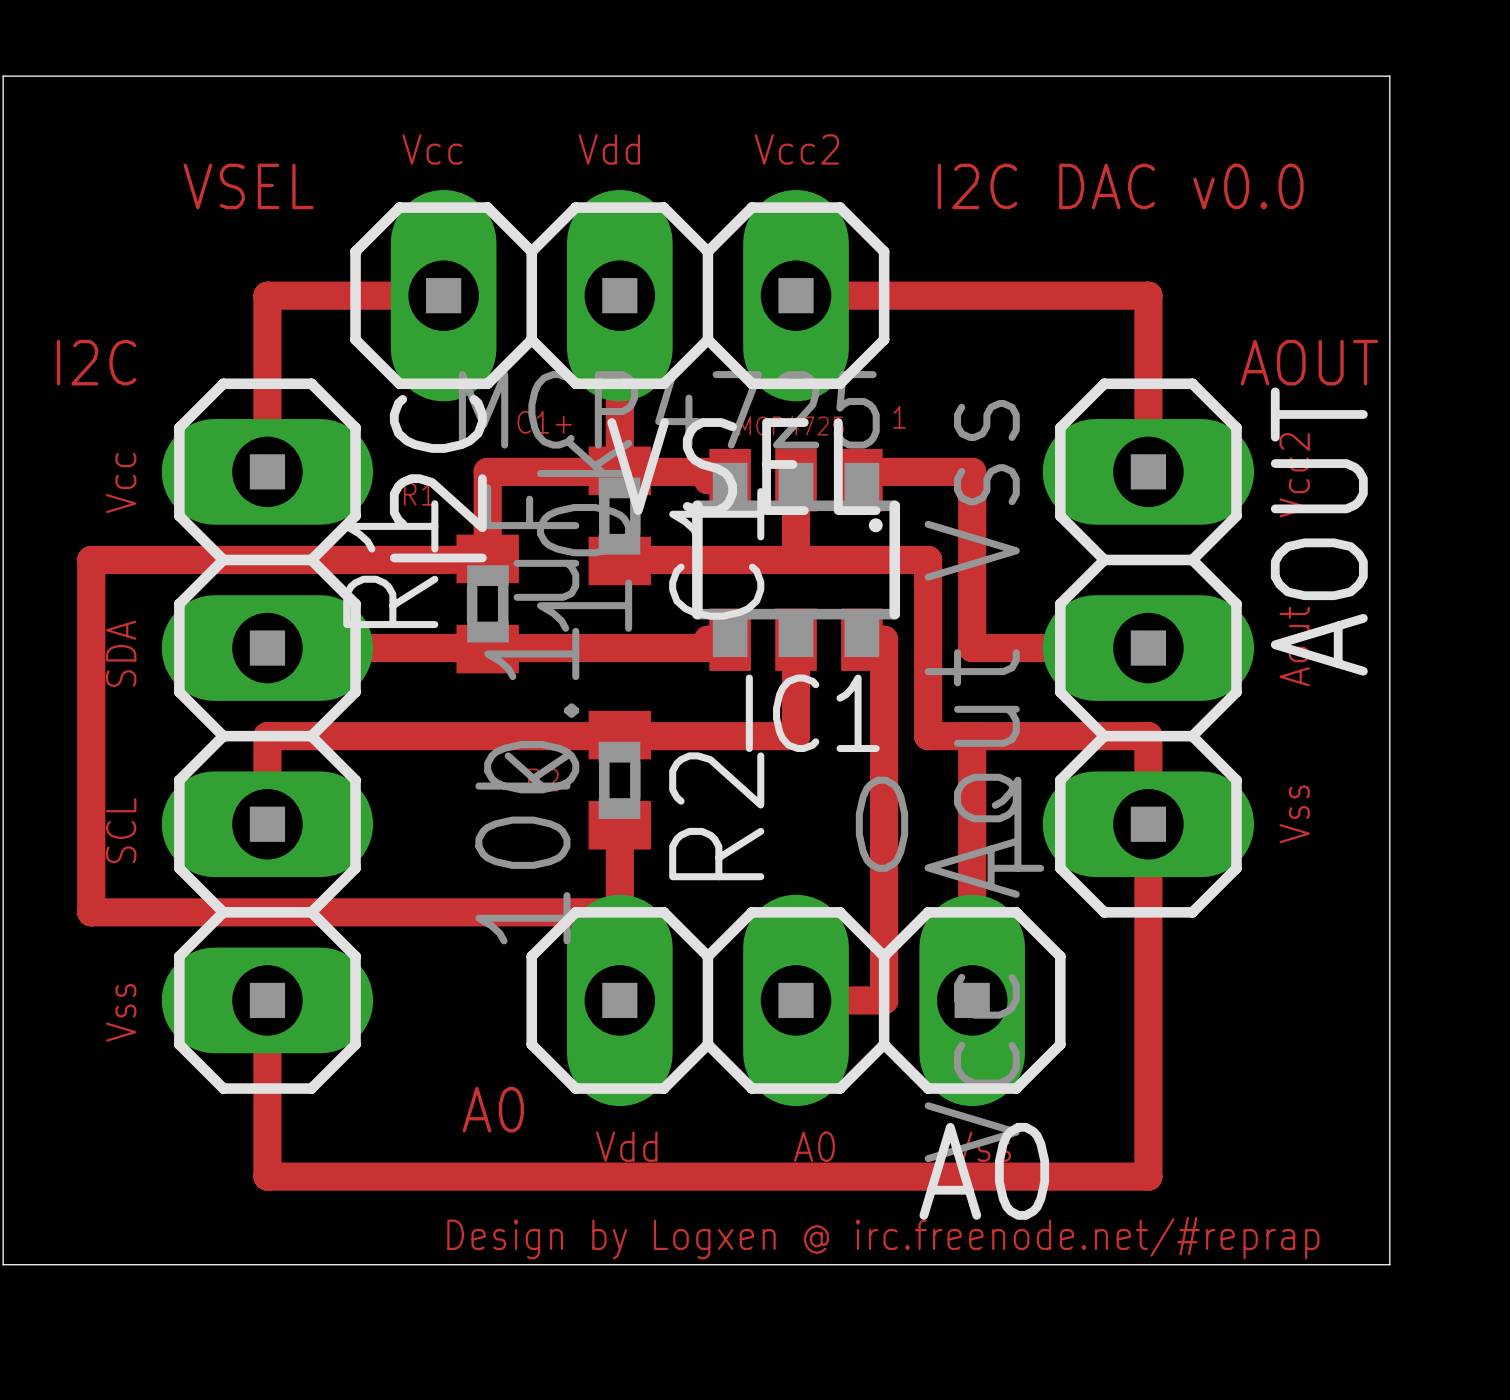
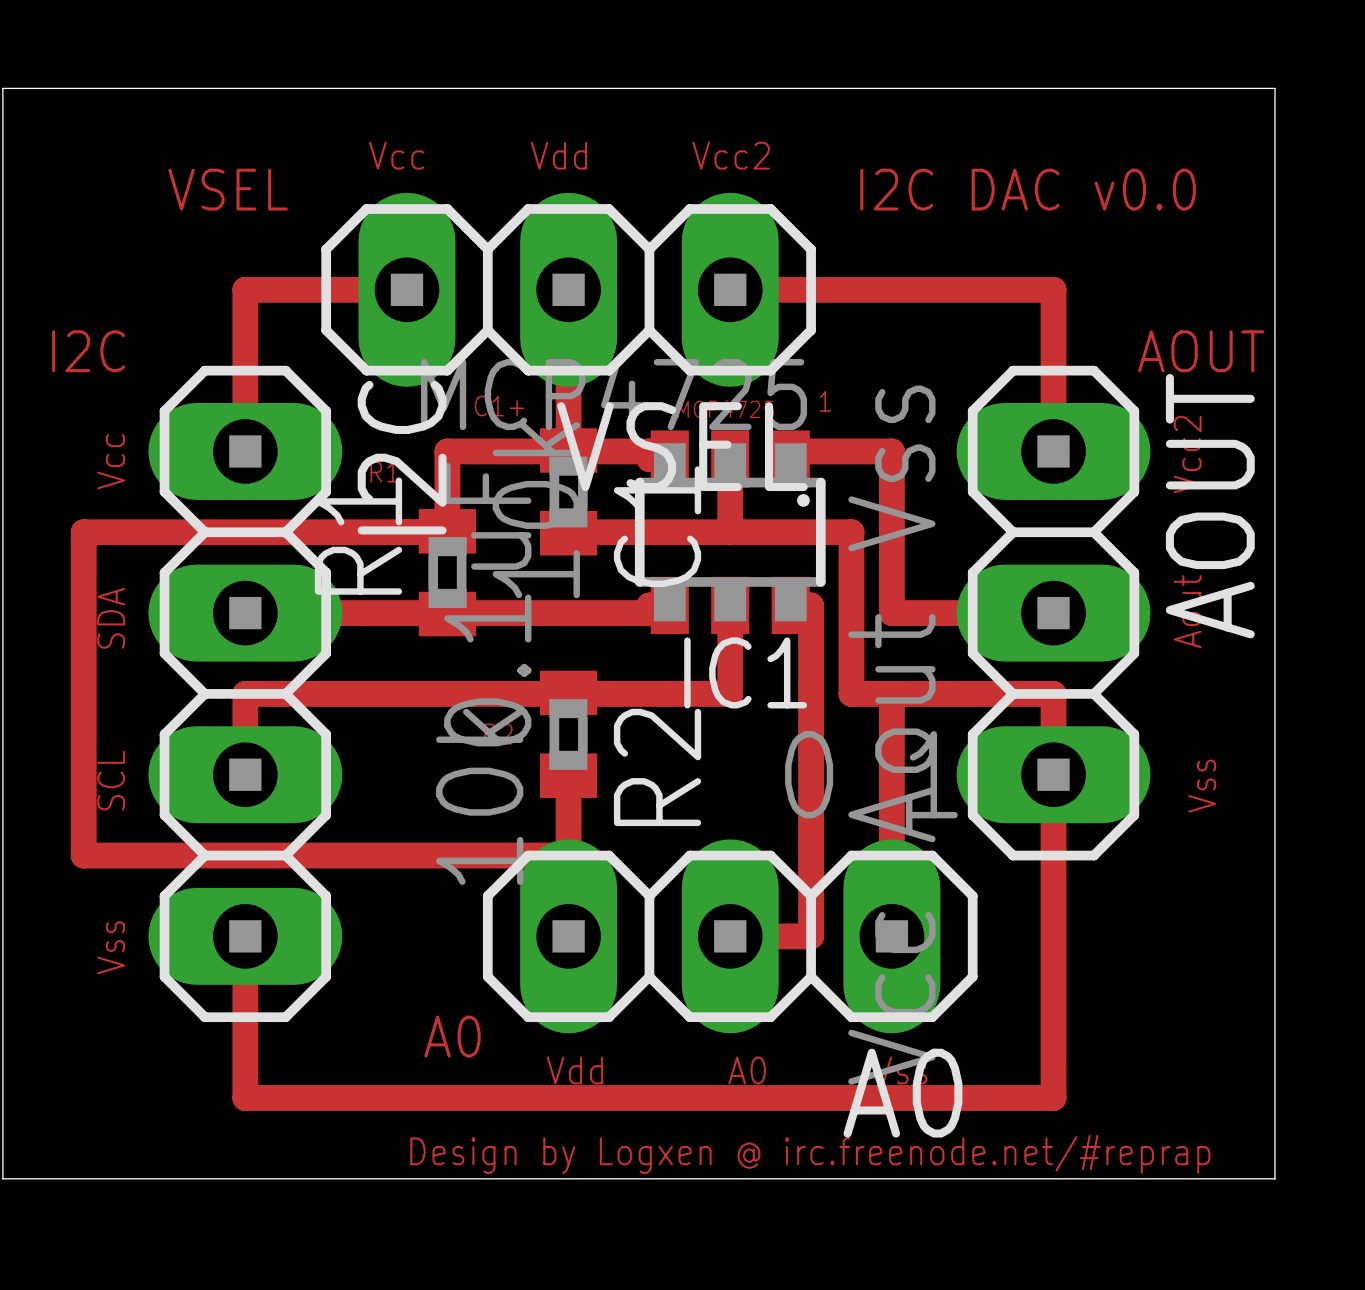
text position: Vss (1294, 814) -> Vss (1202, 786)

